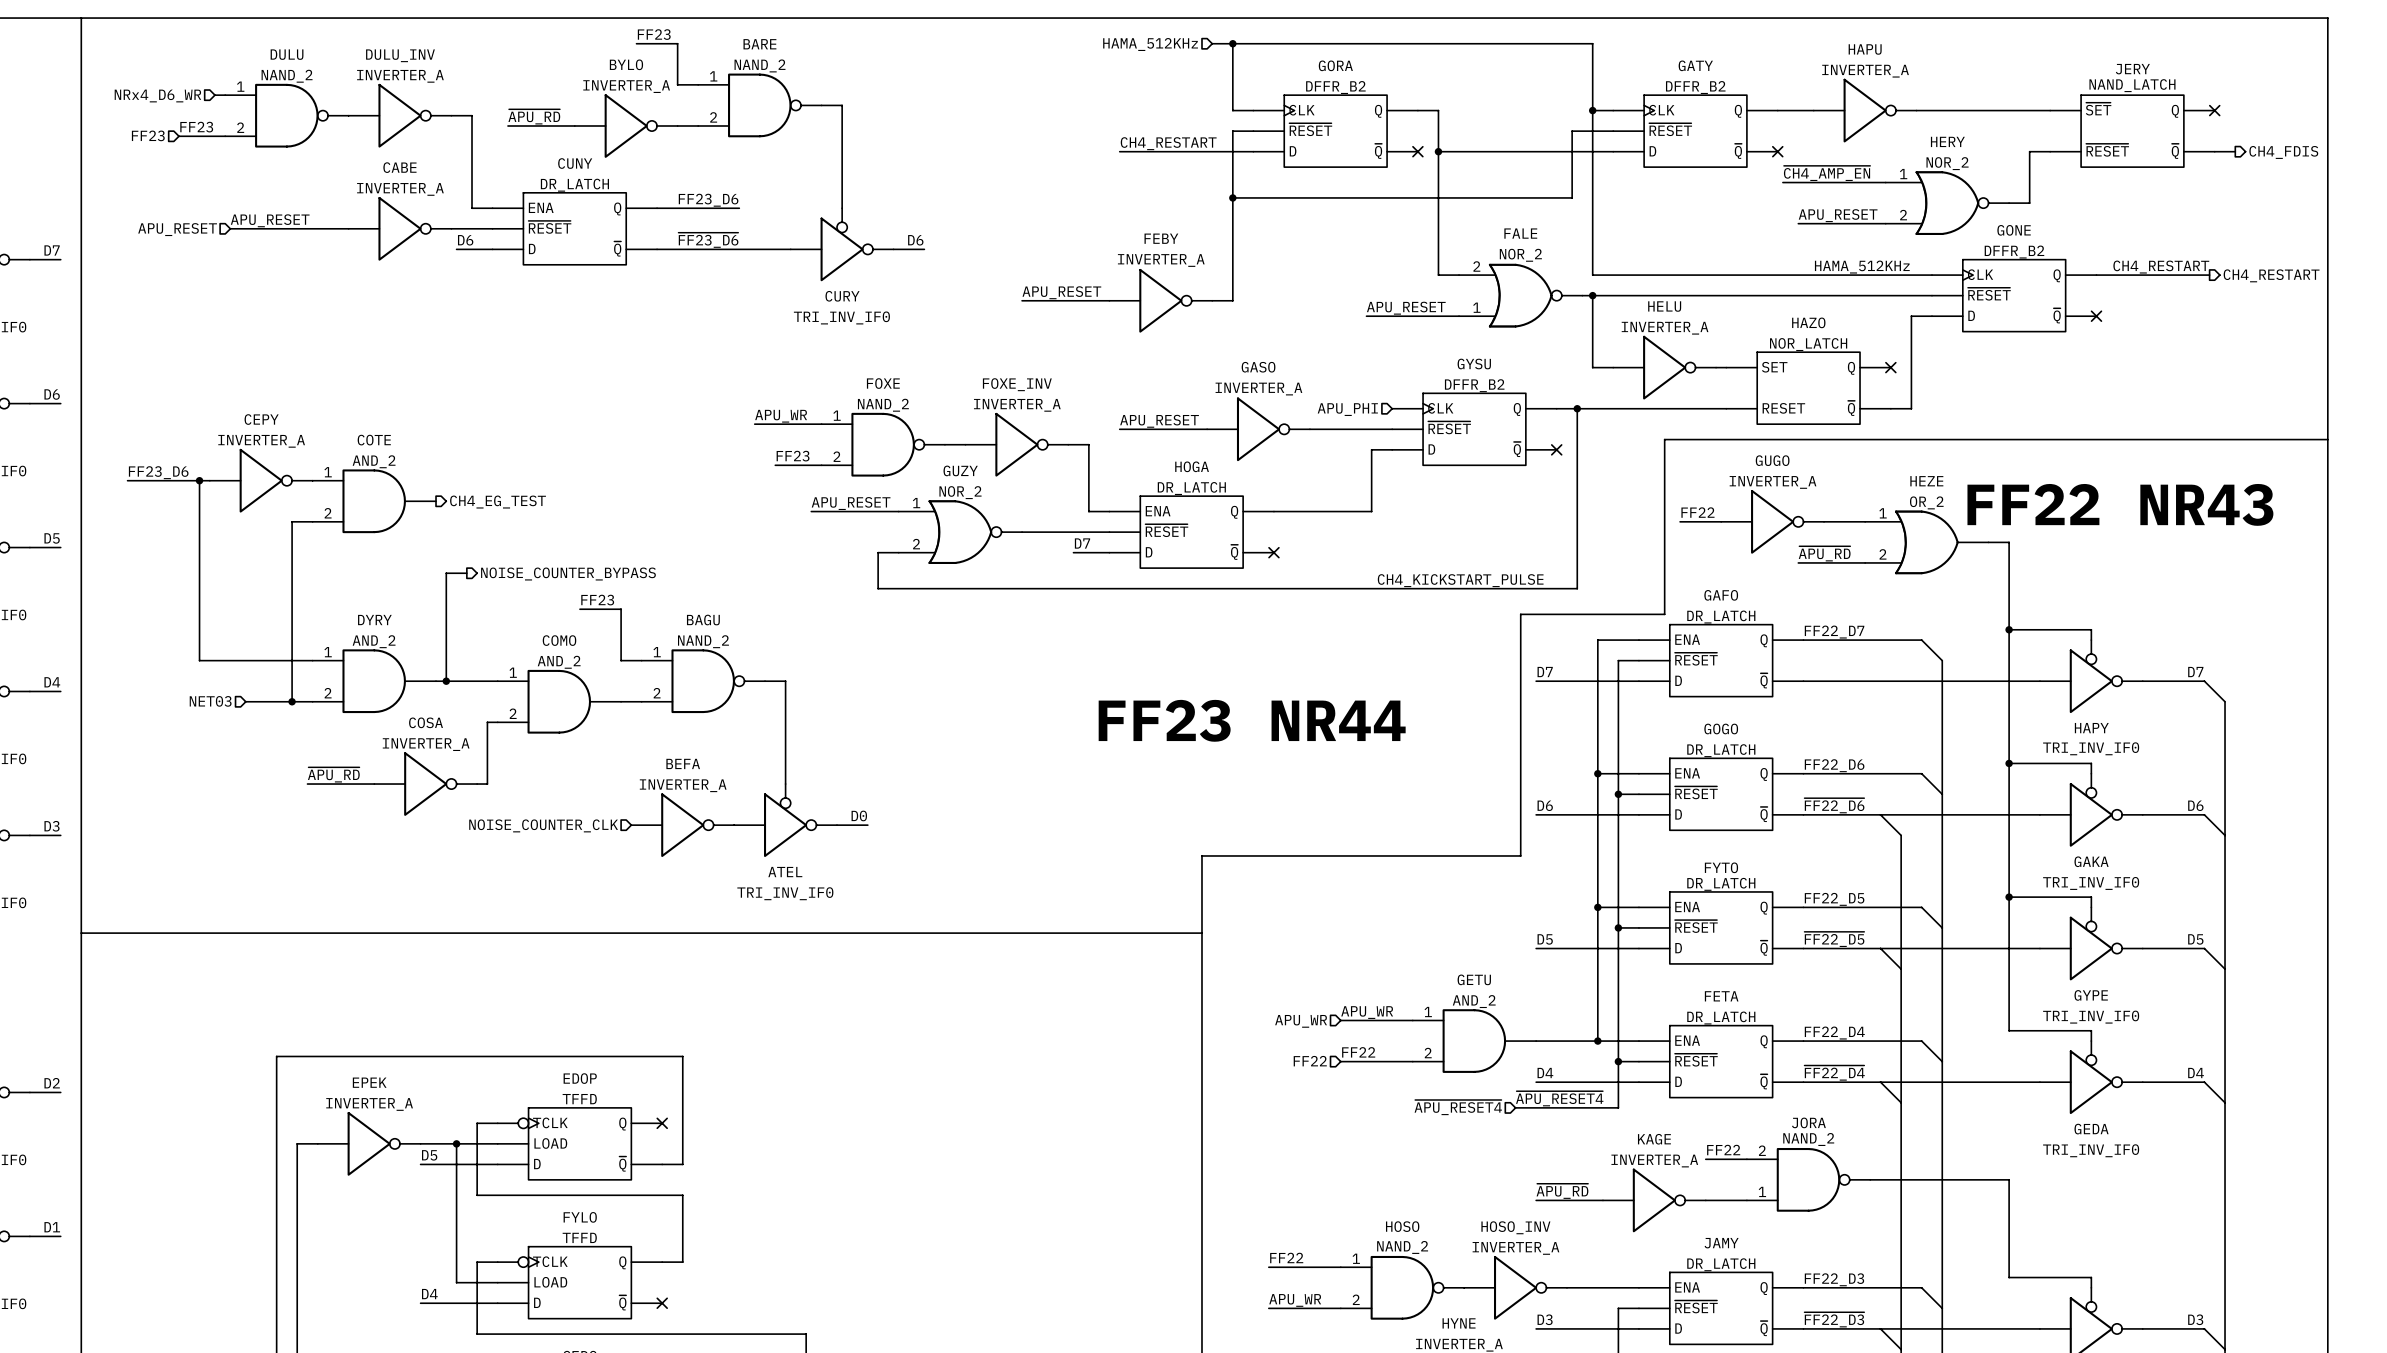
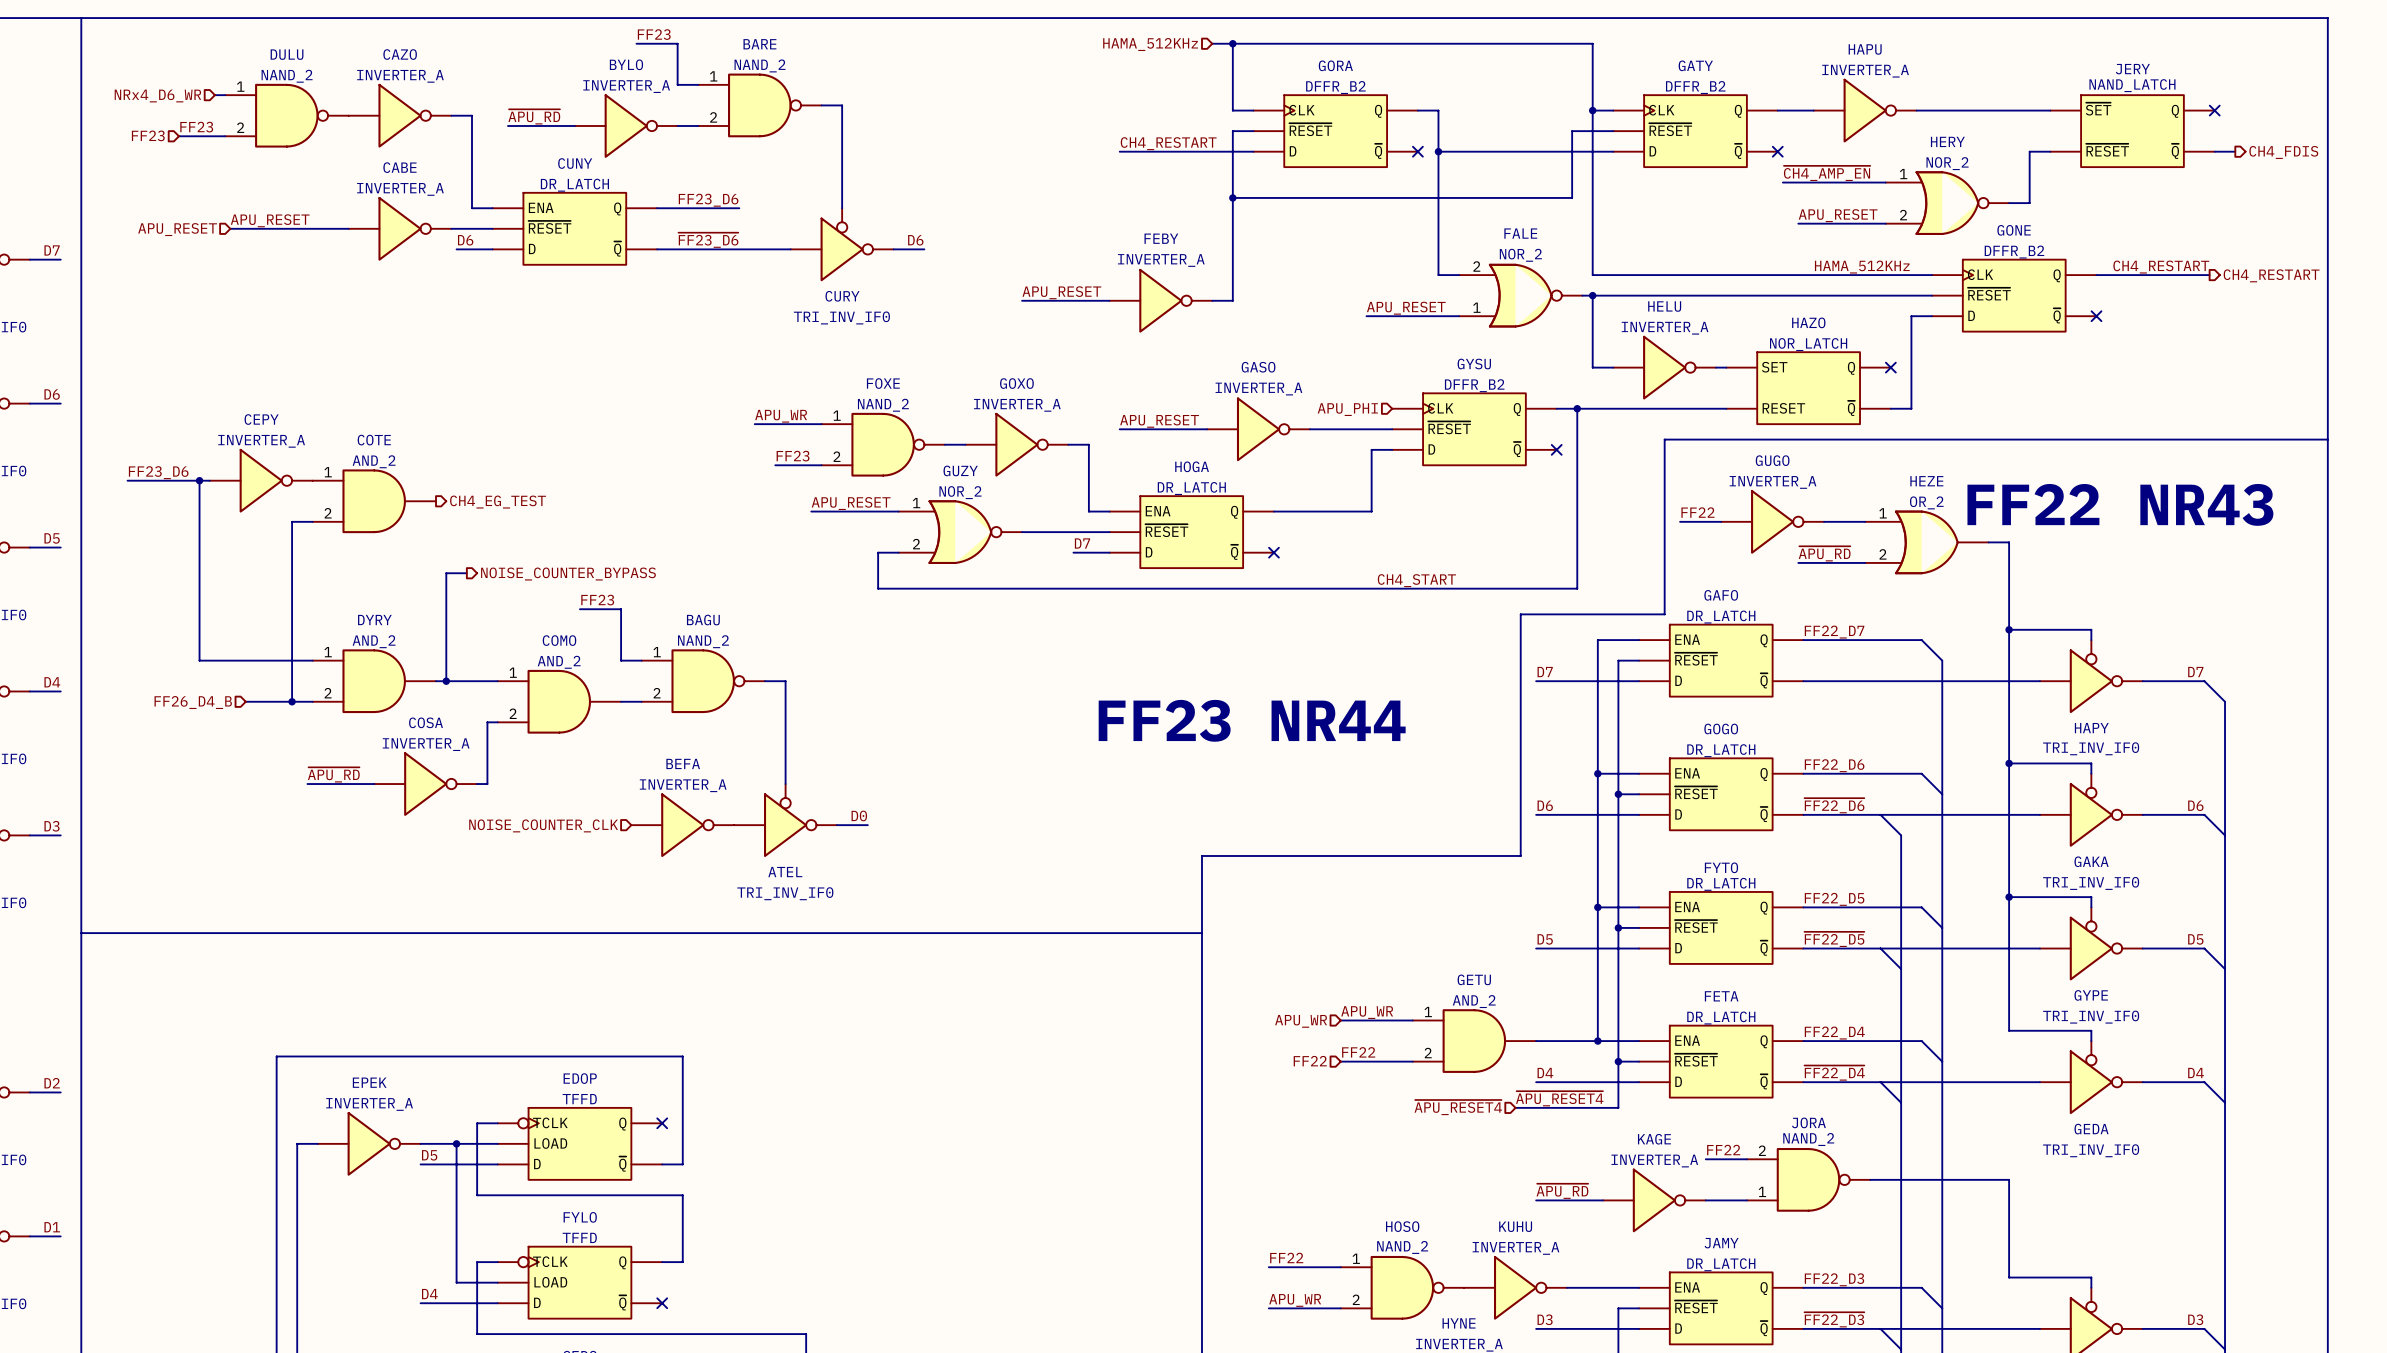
DULU_INV name: DULU_INV (400, 55) -> CAZO (400, 54)
FOXE_INV name: FOXE_INV (1017, 384) -> GOXO (1016, 383)
label: CH4_KICKSTART_PULSE (1460, 580) -> CH4_START (1416, 580)
hierarchical label: NET03 (210, 701) -> FF26_D4_B (193, 702)
HOSO_INV name: HOSO_INV (1515, 1227) -> KUHU (1515, 1226)

